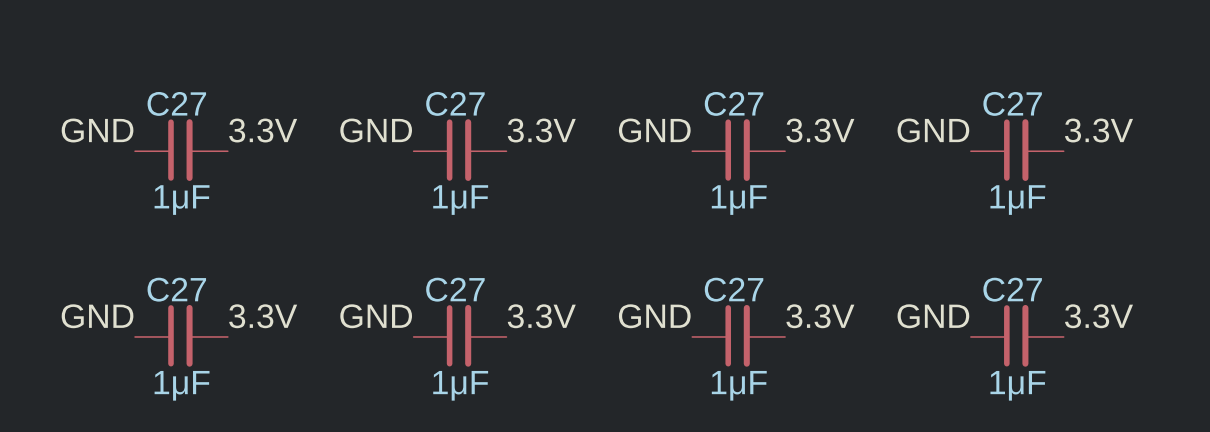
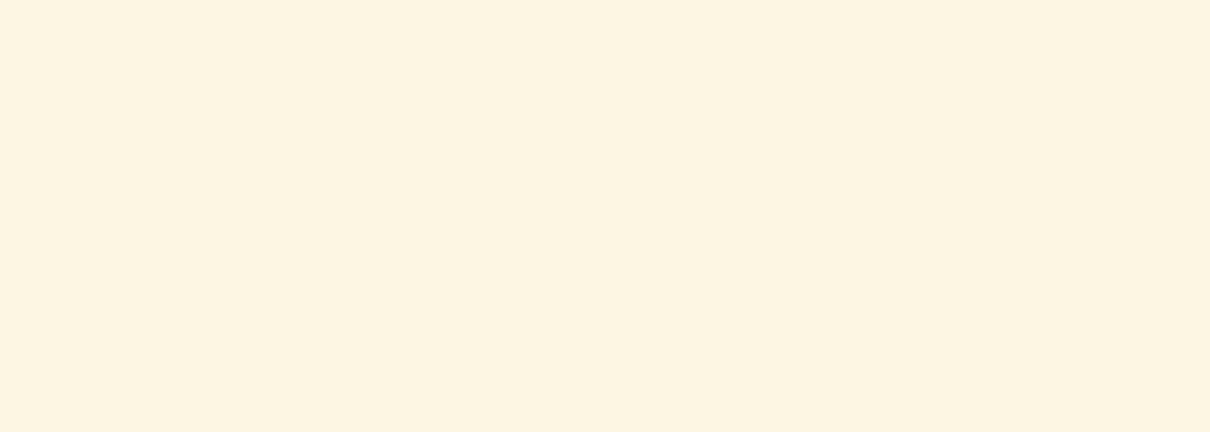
label: GND (97, 130) -> none
label: 3.3V (263, 130) -> none
label: GND (376, 130) -> none
label: 3.3V (541, 130) -> none
label: GND (654, 130) -> none
label: 3.3V (820, 130) -> none
label: GND (933, 130) -> none
label: 3.3V (1099, 130) -> none
C27: 1μF (181, 150) -> none
C27: 1μF (460, 150) -> none
C27: 1μF (738, 150) -> none
C27: 1μF (1017, 150) -> none
label: GND (97, 316) -> none
label: 3.3V (263, 316) -> none
label: GND (376, 316) -> none
label: 3.3V (541, 316) -> none
label: GND (654, 316) -> none
label: 3.3V (820, 316) -> none
label: GND (933, 316) -> none
label: 3.3V (1099, 316) -> none
C27: 1μF (181, 335) -> none
C27: 1μF (460, 335) -> none
C27: 1μF (738, 335) -> none
C27: 1μF (1017, 335) -> none

